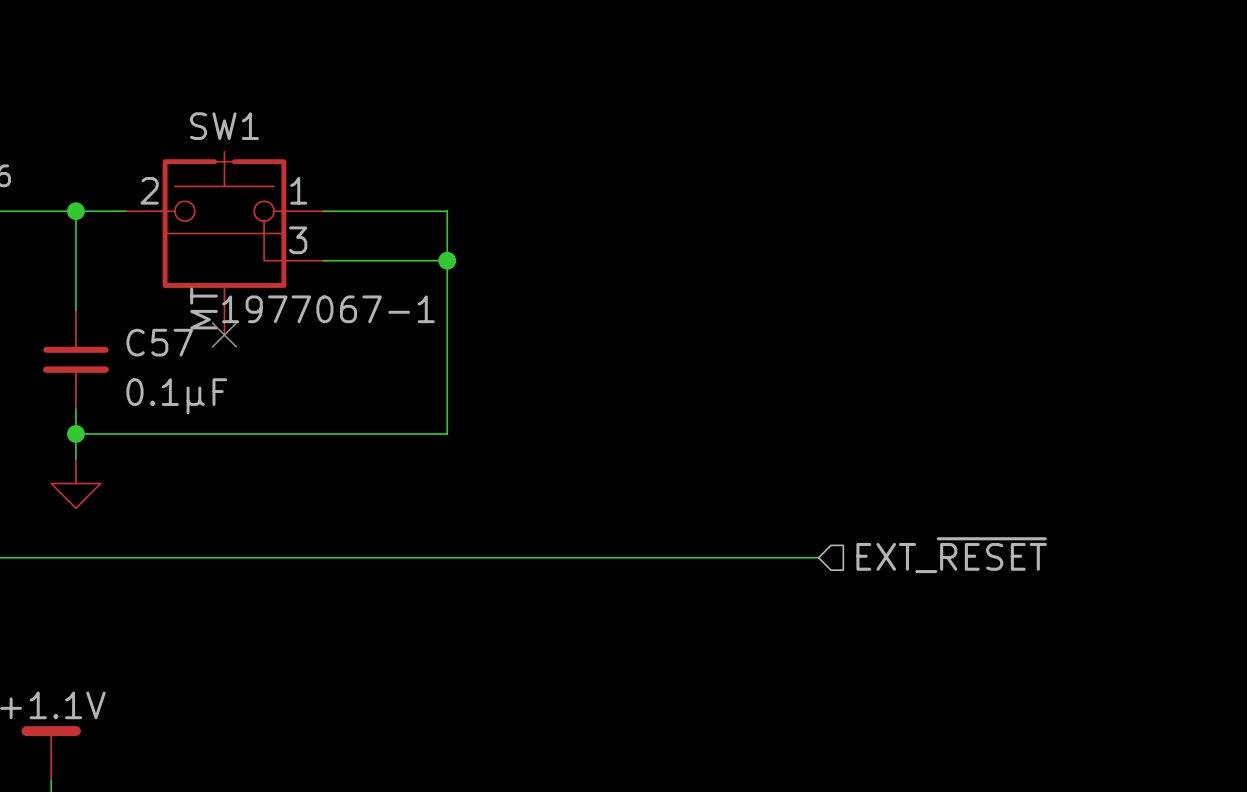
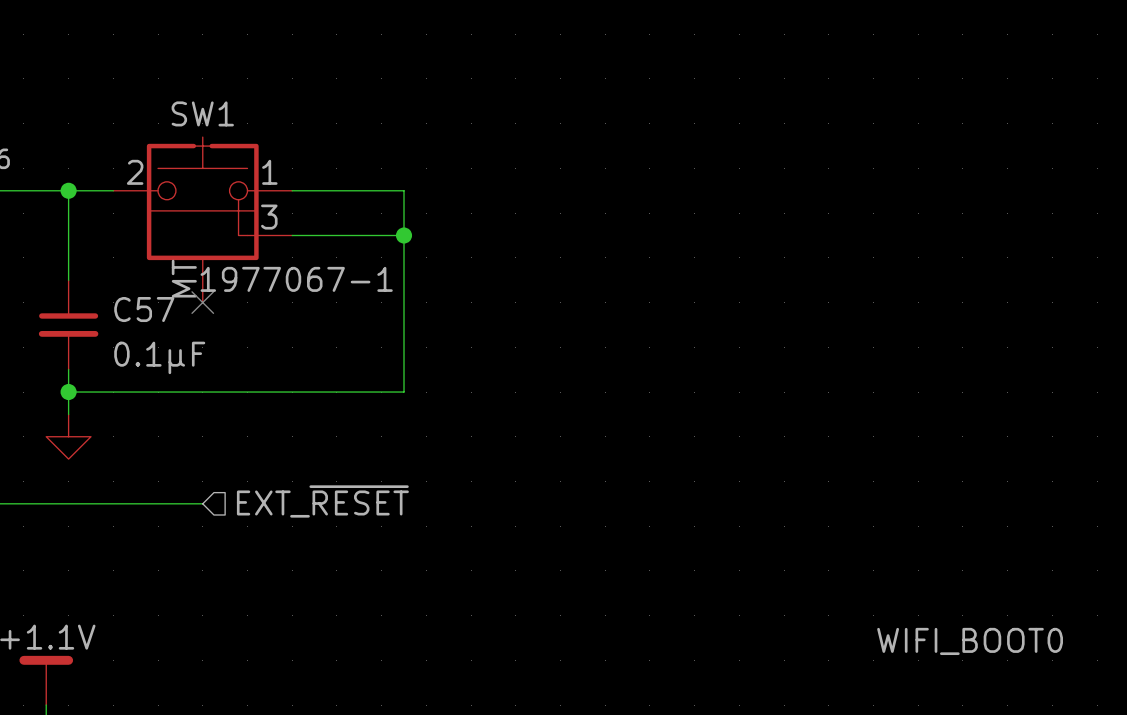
hierarchical label: none -> EXT_~{RESET} (322, 501)
hierarchical label: EXT_~{RESET} (951, 555) -> none
wire: (224, 557) (818, 557) -> none
label: none -> WIFI_BOOT0 (970, 641)

